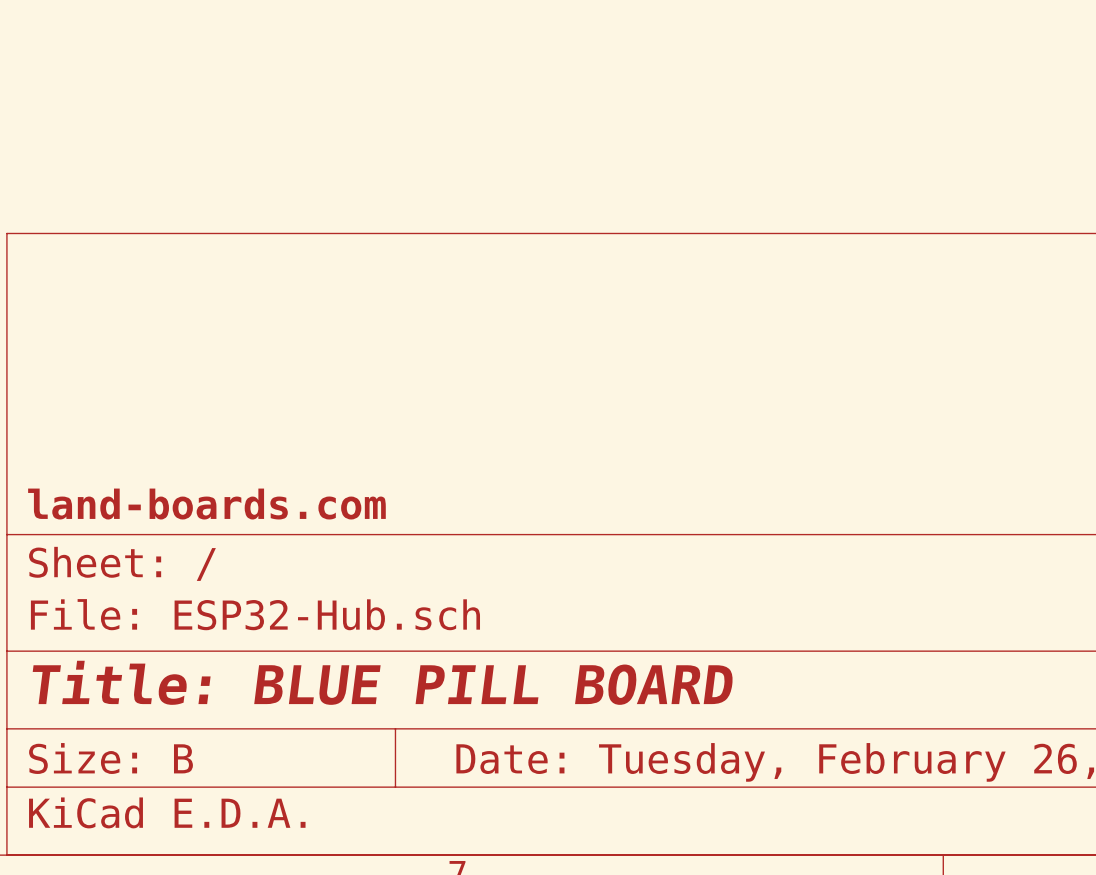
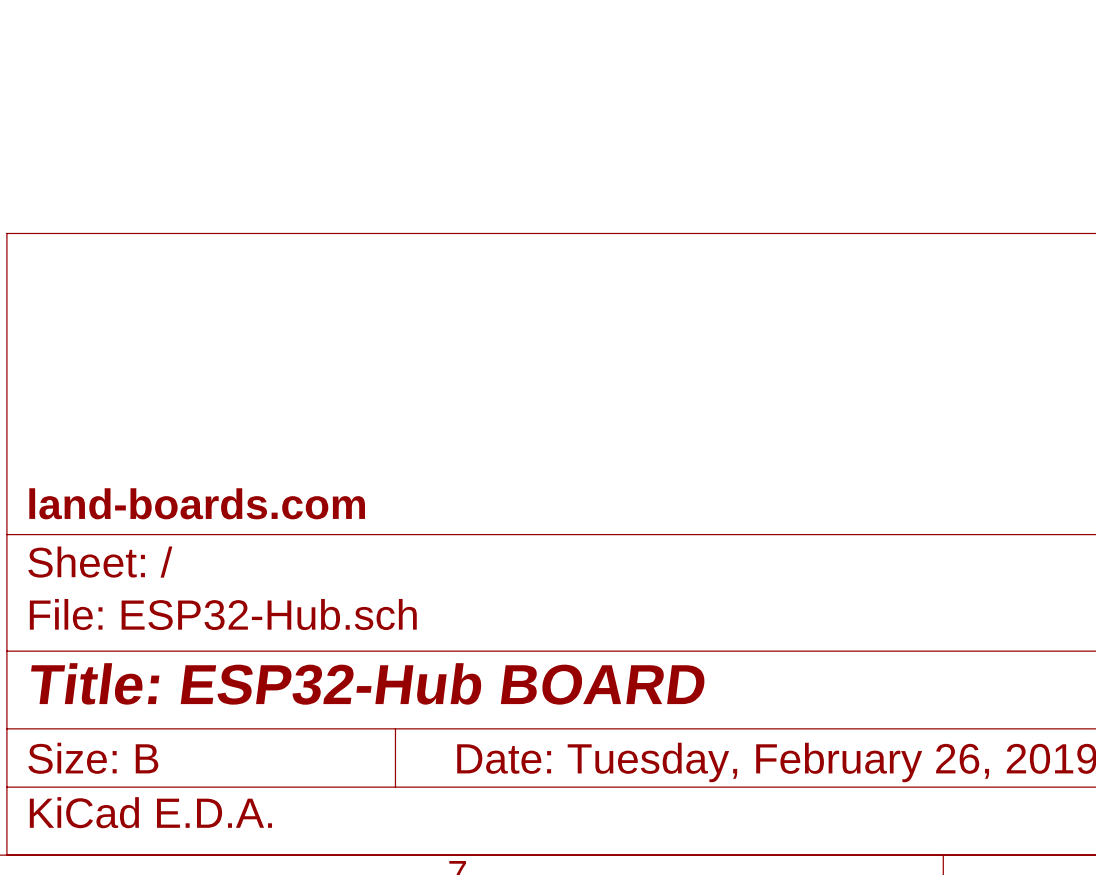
title block: Title: BLUE PILL BOARD (383, 682) -> Title: ESP32-Hub BOARD (368, 683)

